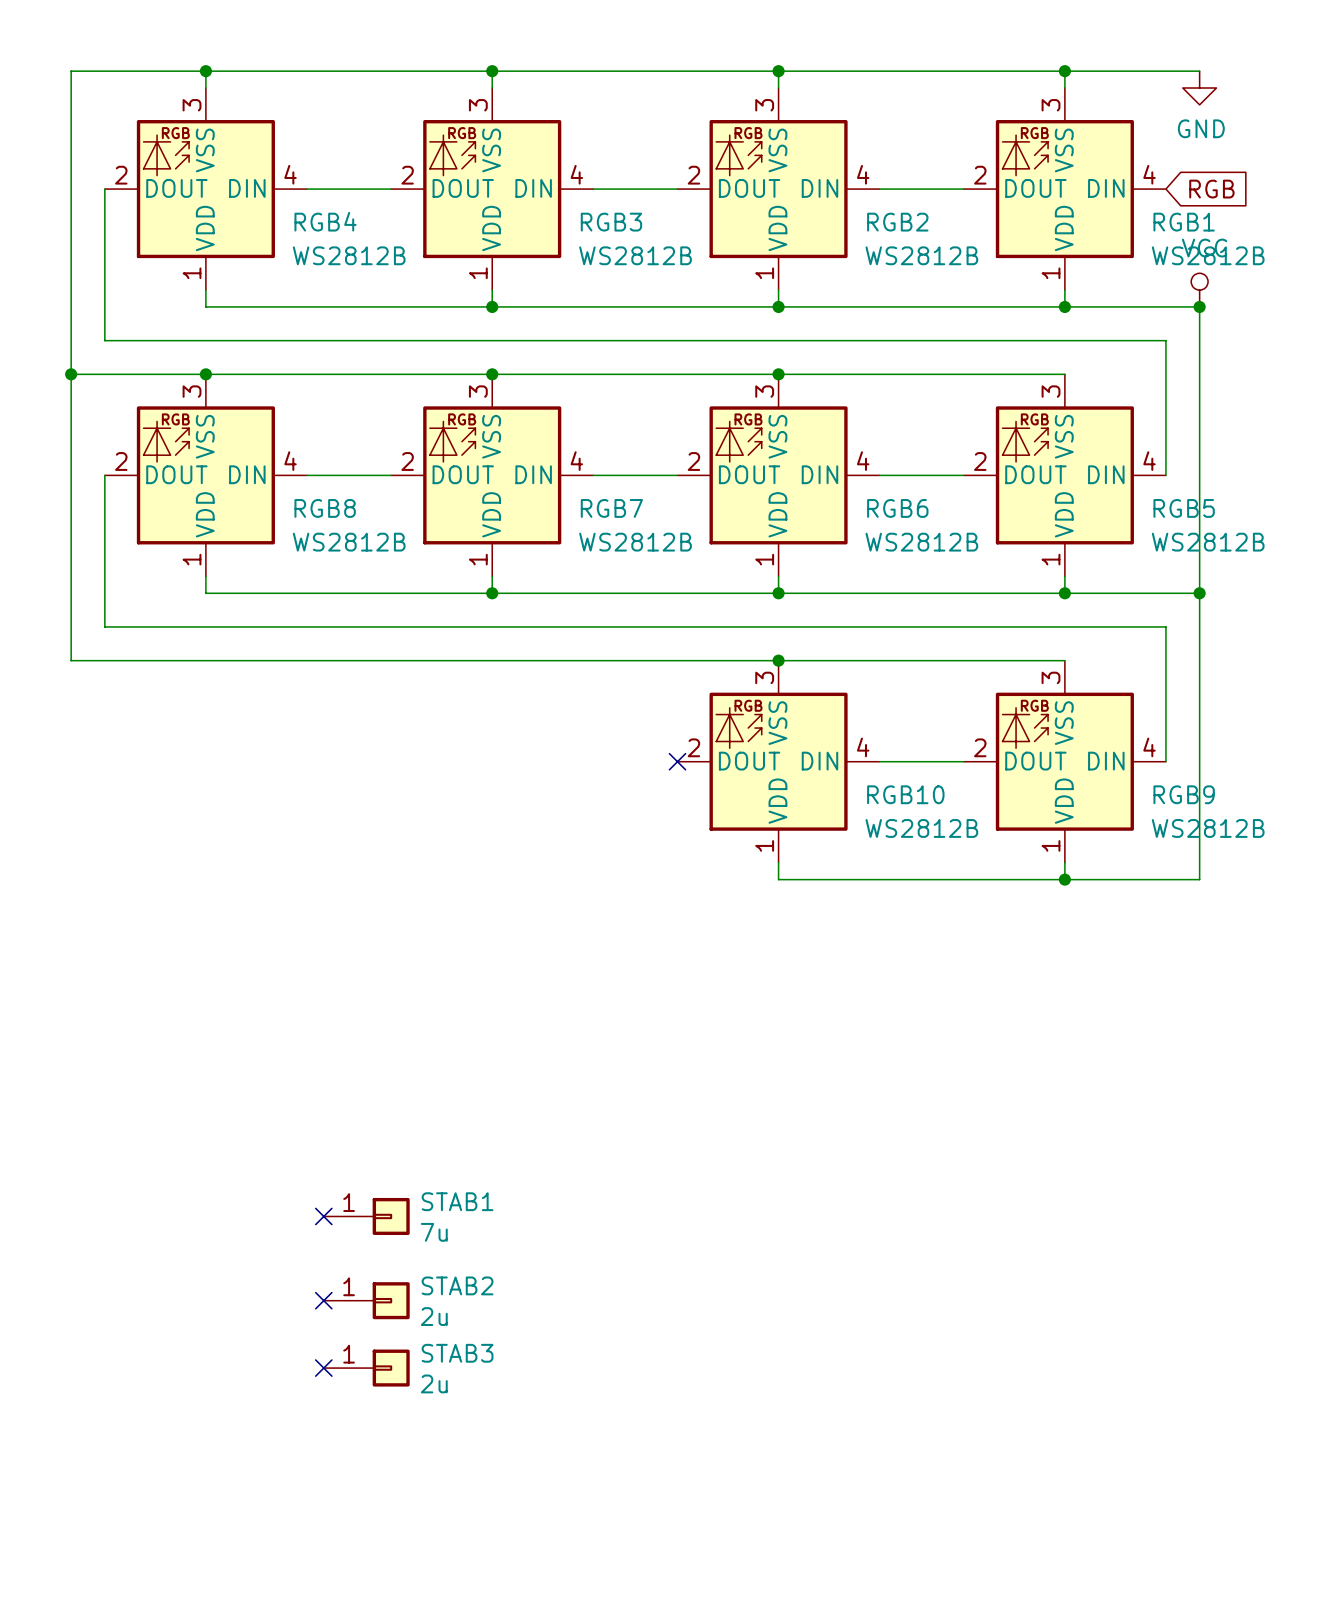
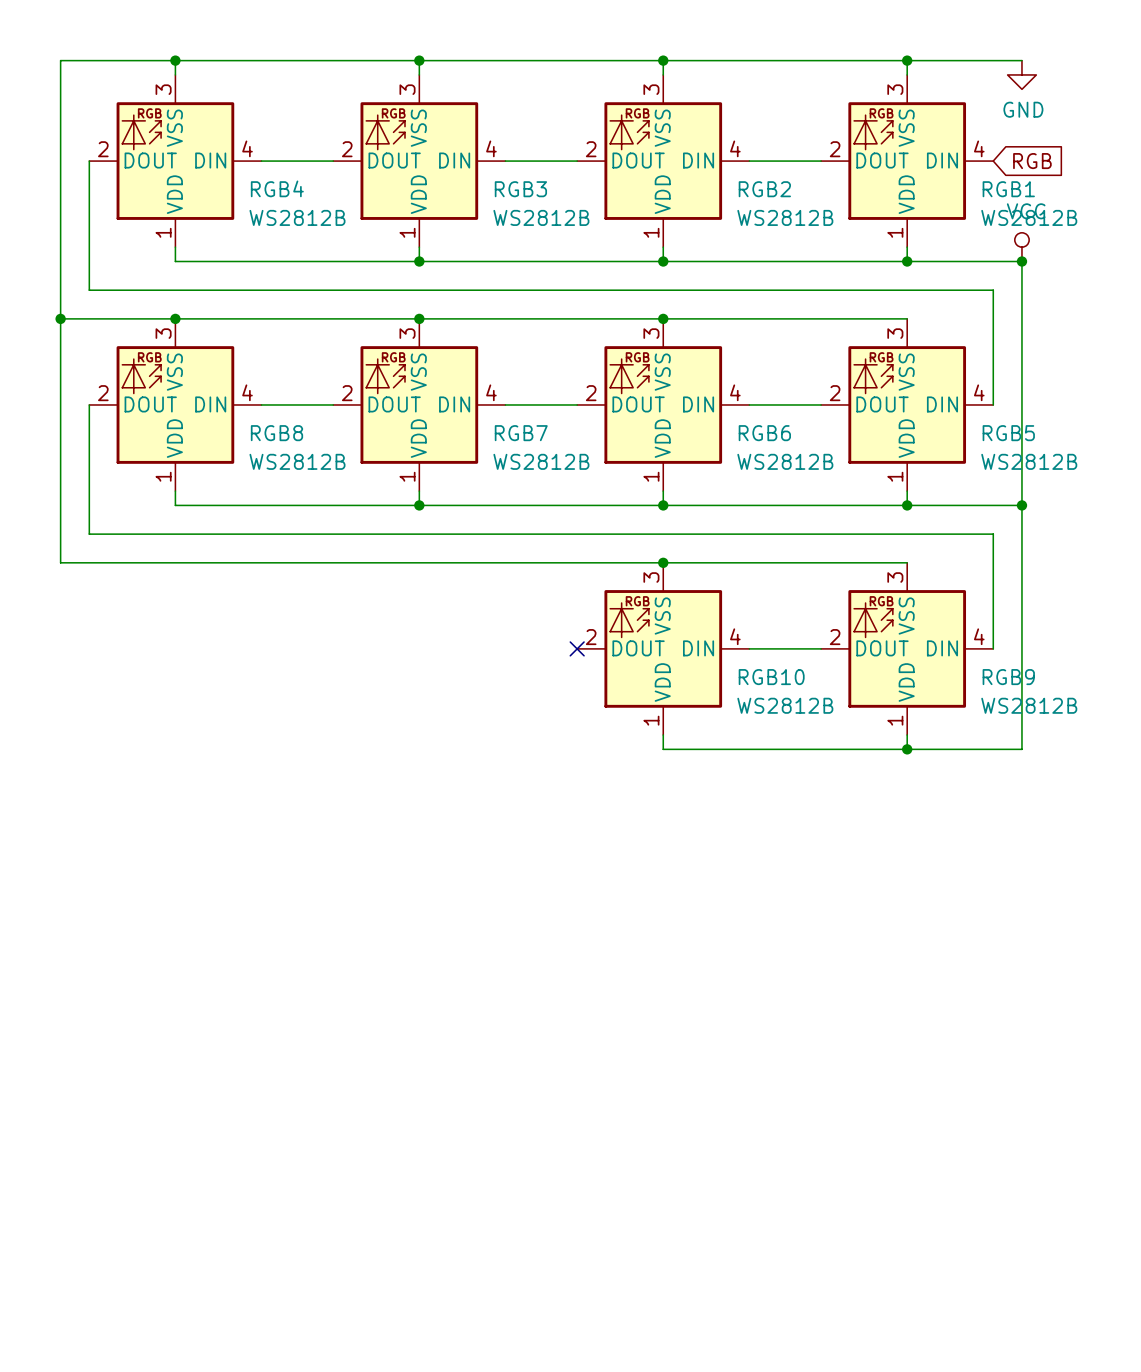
no-connect mark: (323, 1216) -> none
STAB1: 7u (366, 1216) -> none
no-connect mark: (323, 1300) -> none
STAB2: 2u (366, 1300) -> none
no-connect mark: (323, 1368) -> none
STAB3: 2u (366, 1368) -> none

